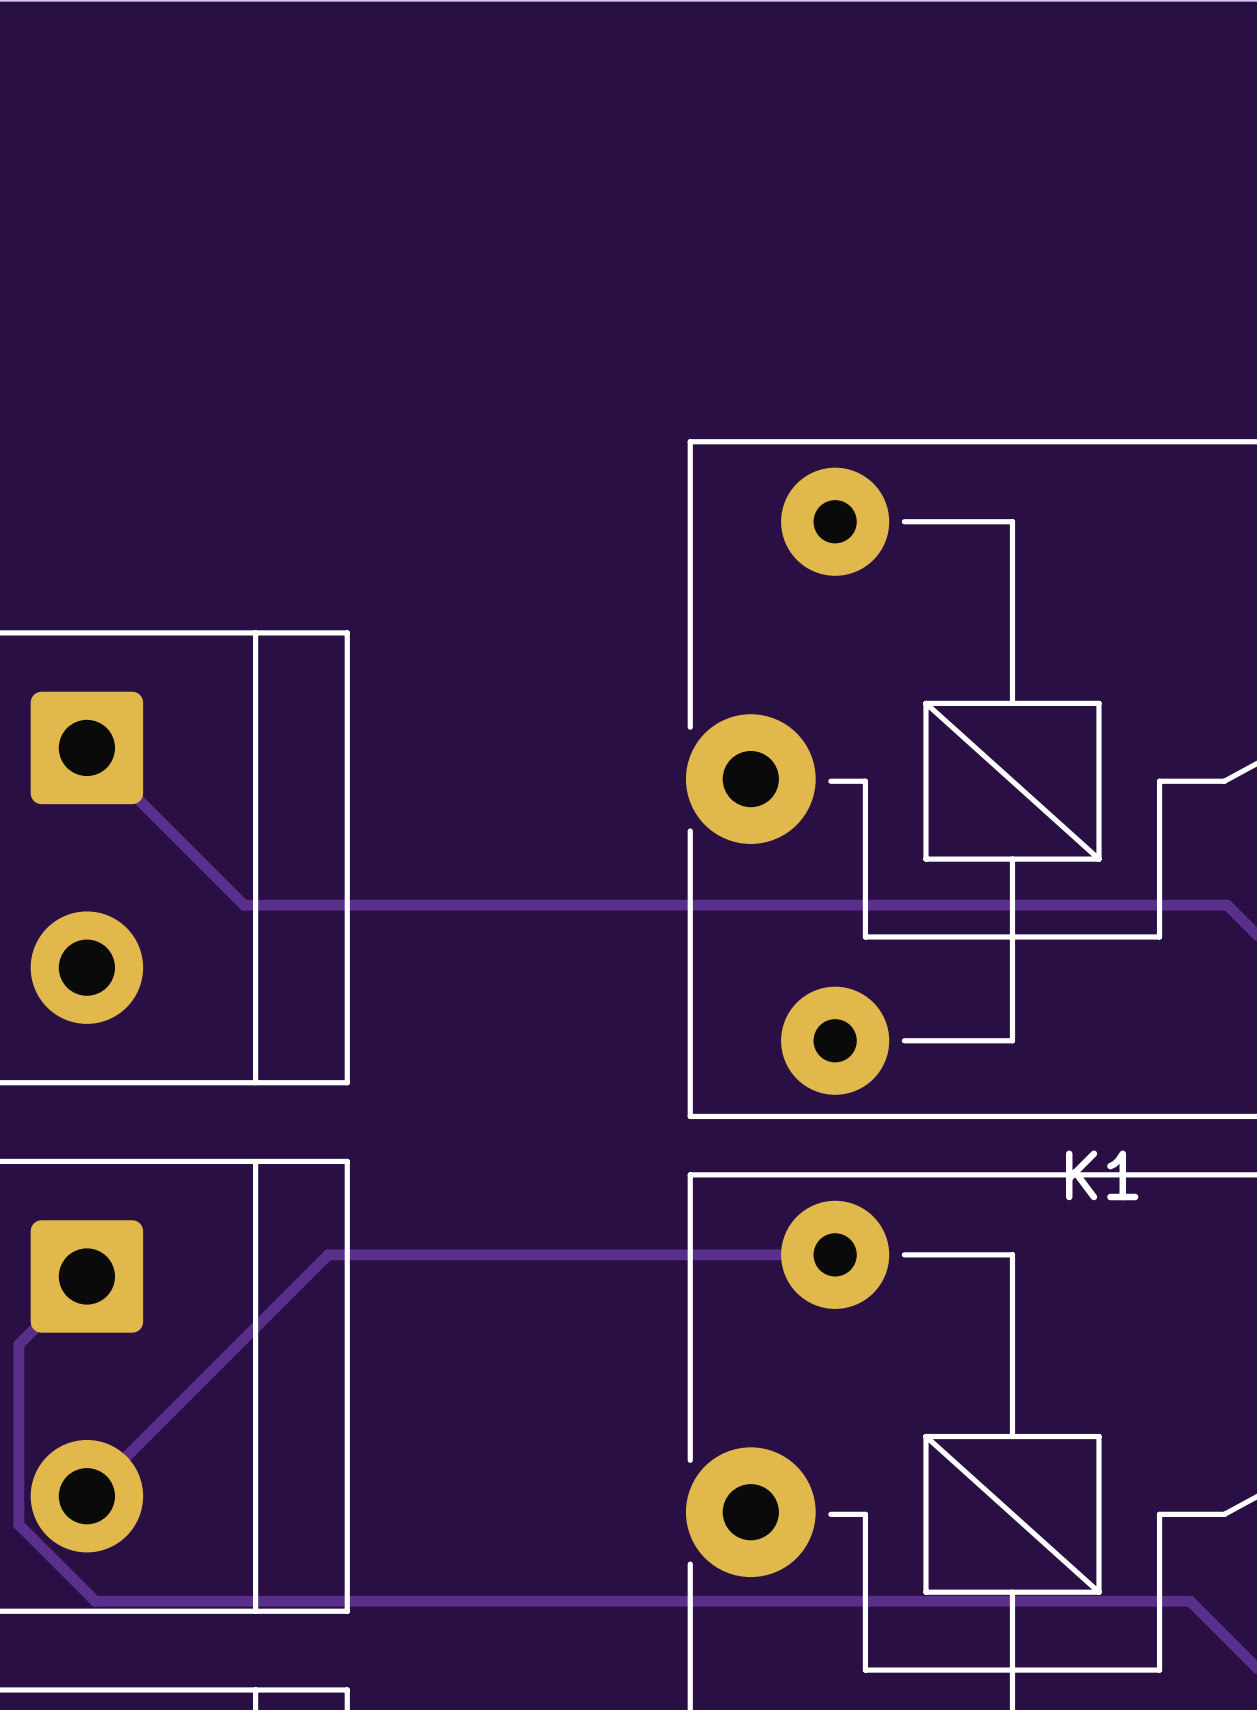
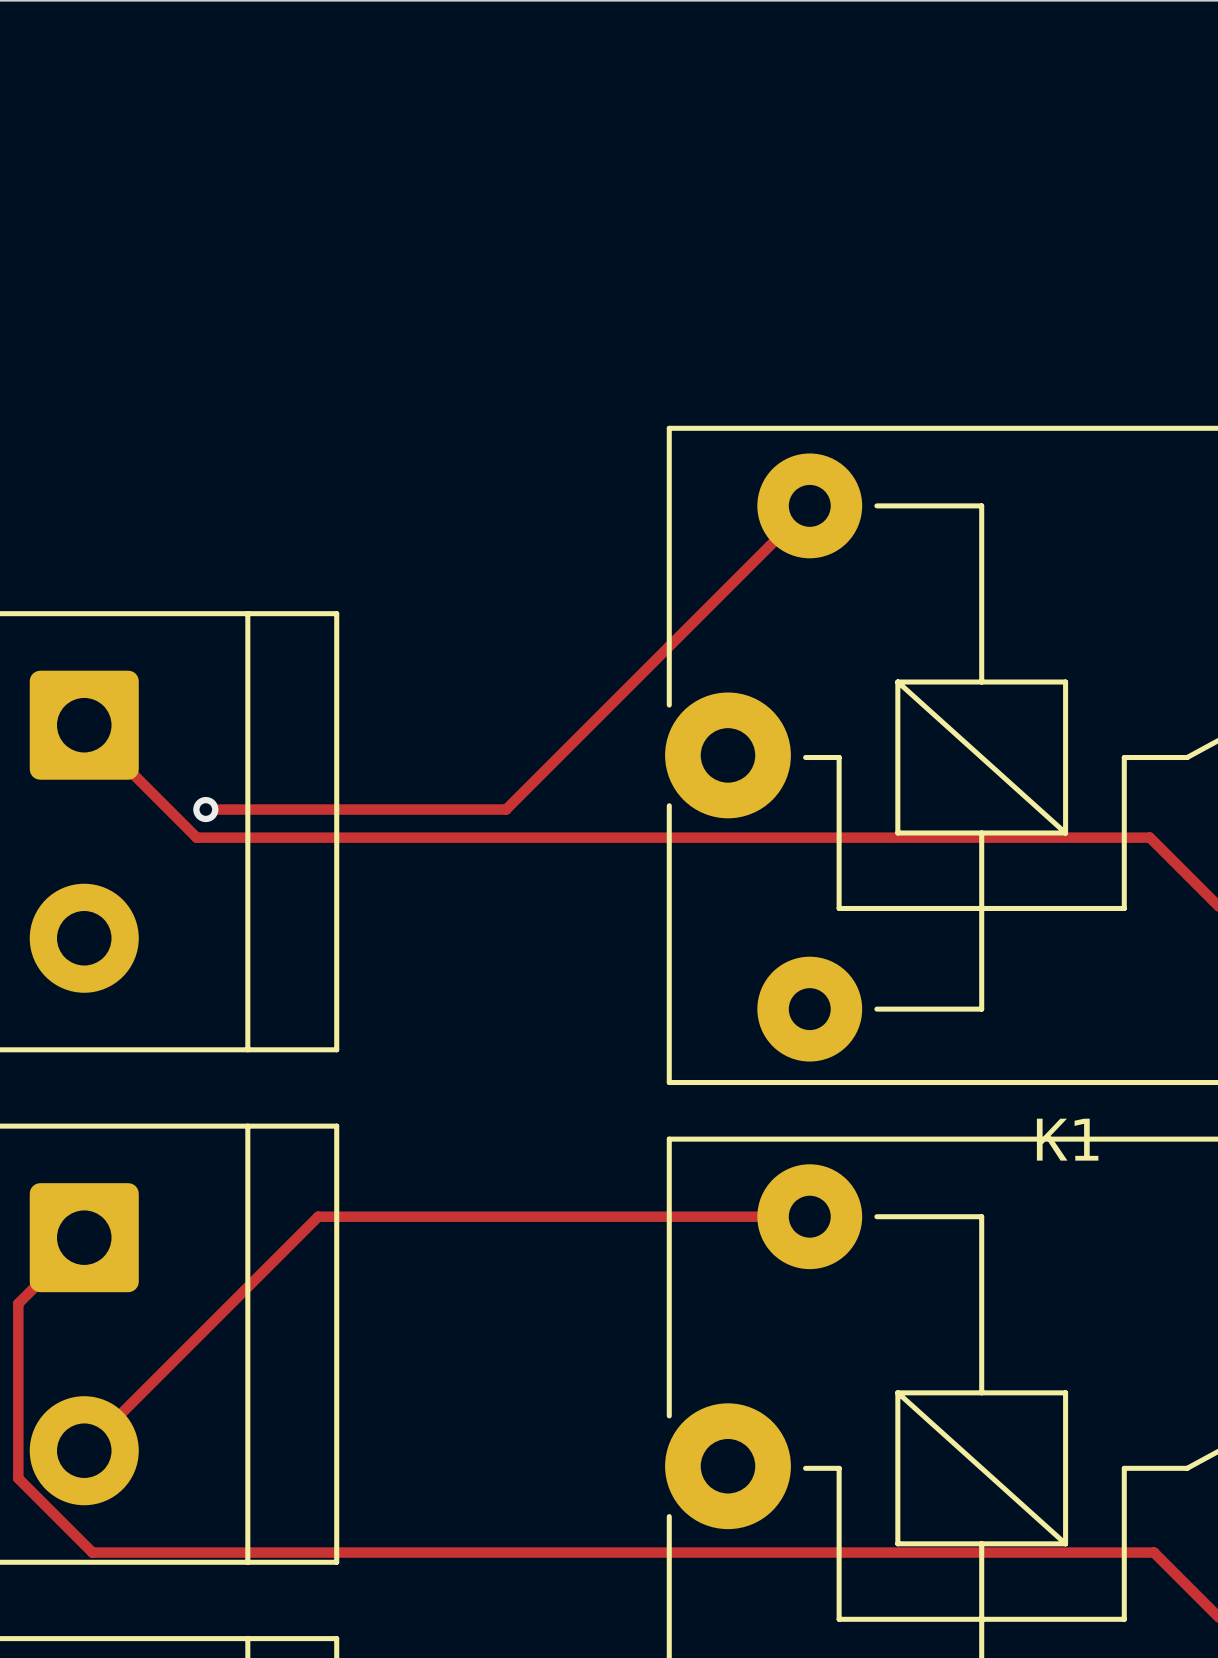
track: none -> (809, 505) (506, 809) (205, 809)
via: none -> (205, 809)
track: (202, 863) (244, 905) (1227, 905) -> (196, 837) (1149, 837) (1189, 877)

